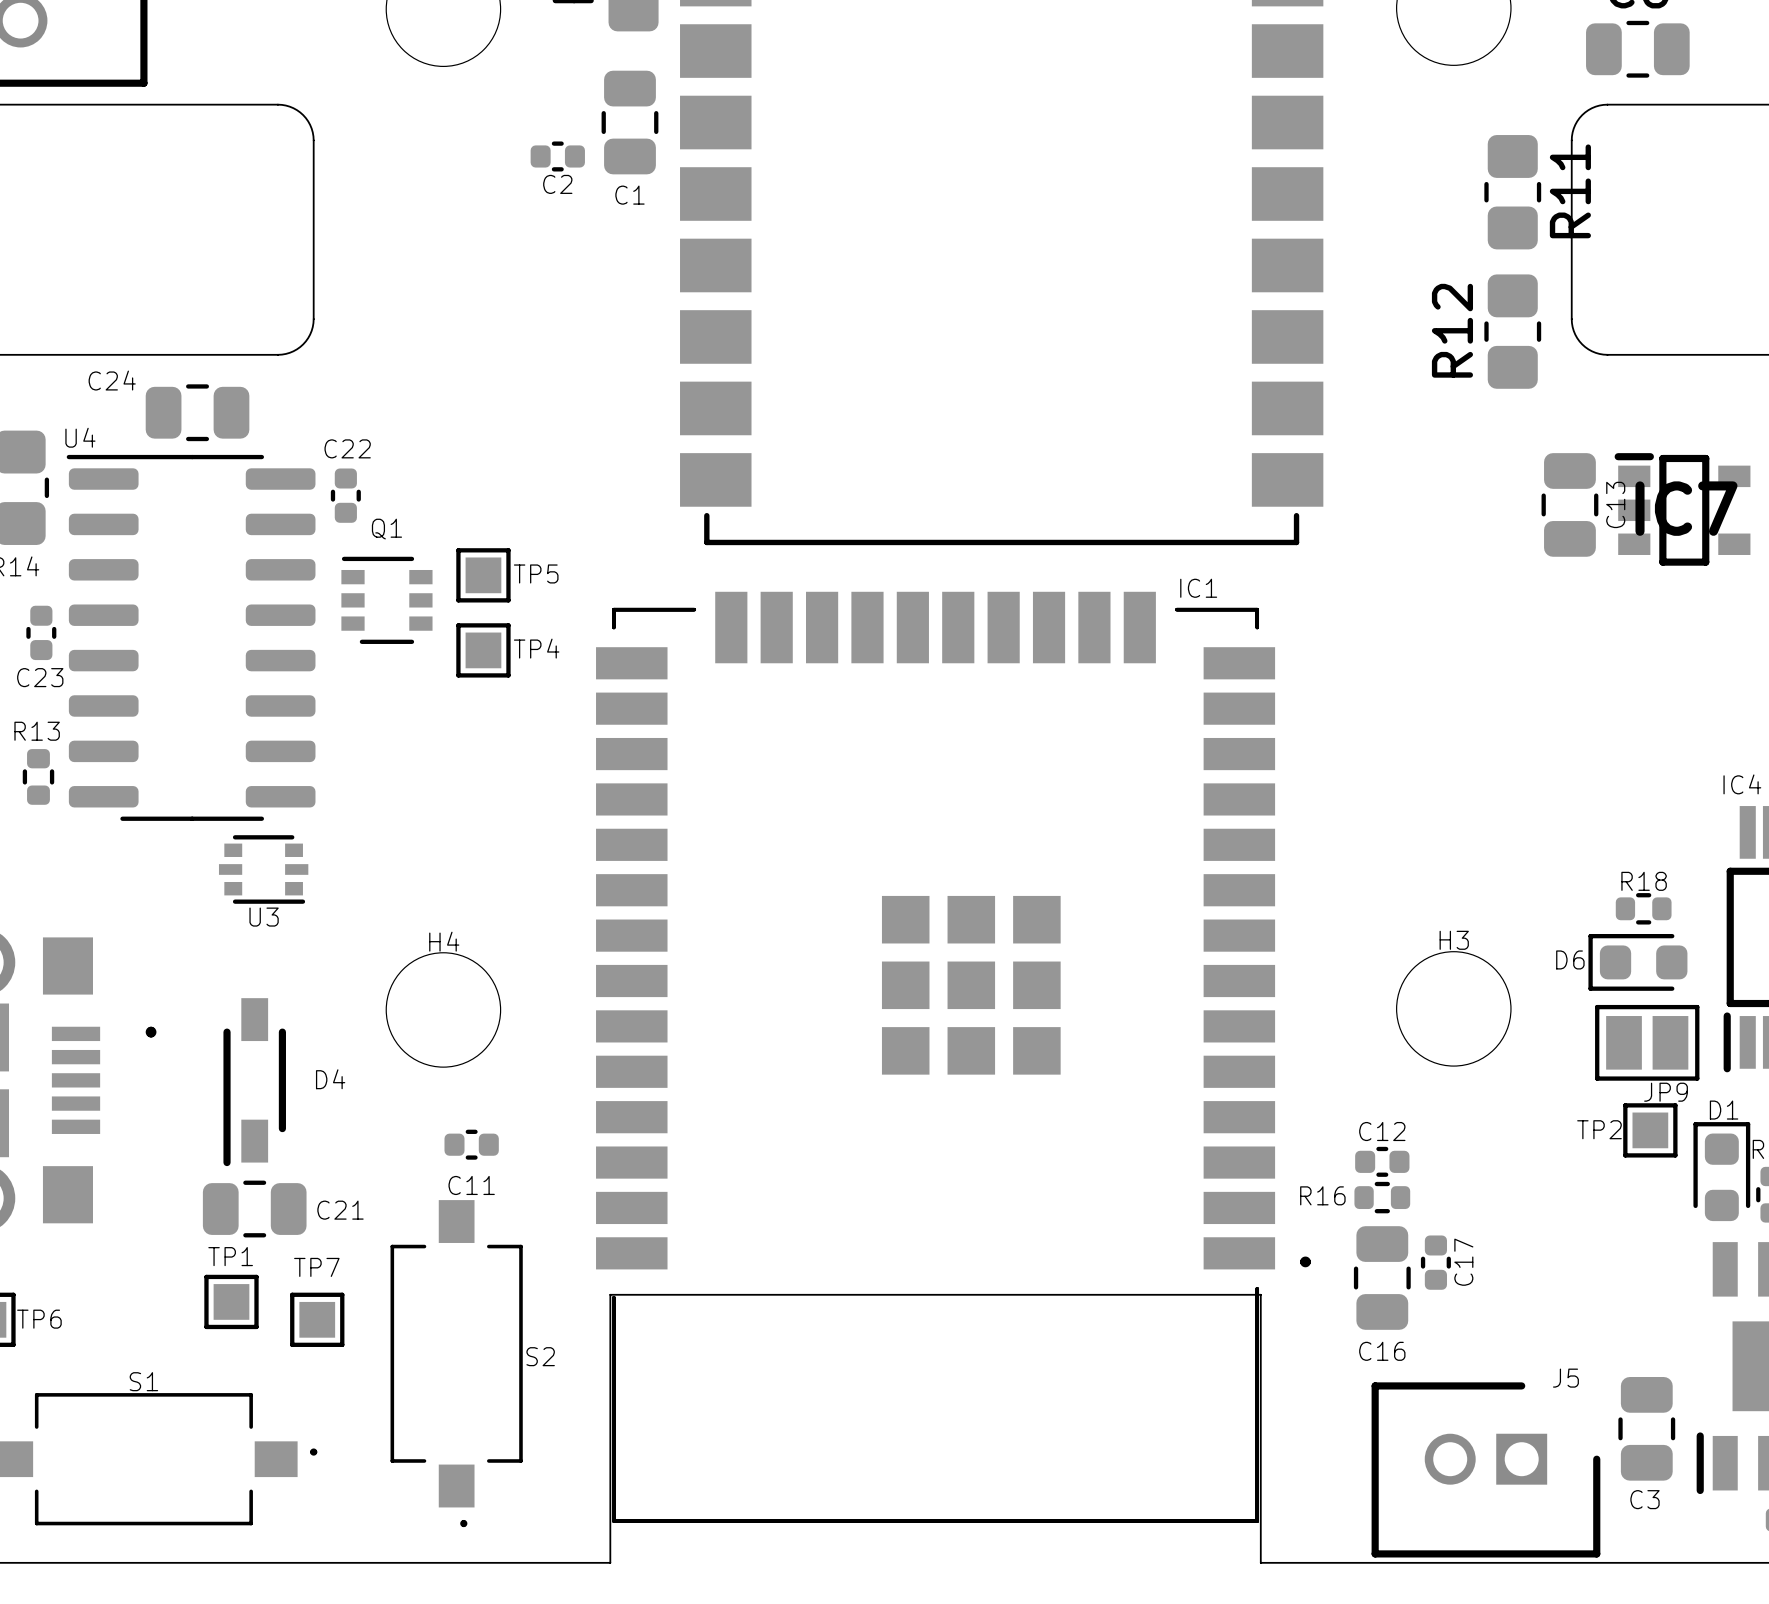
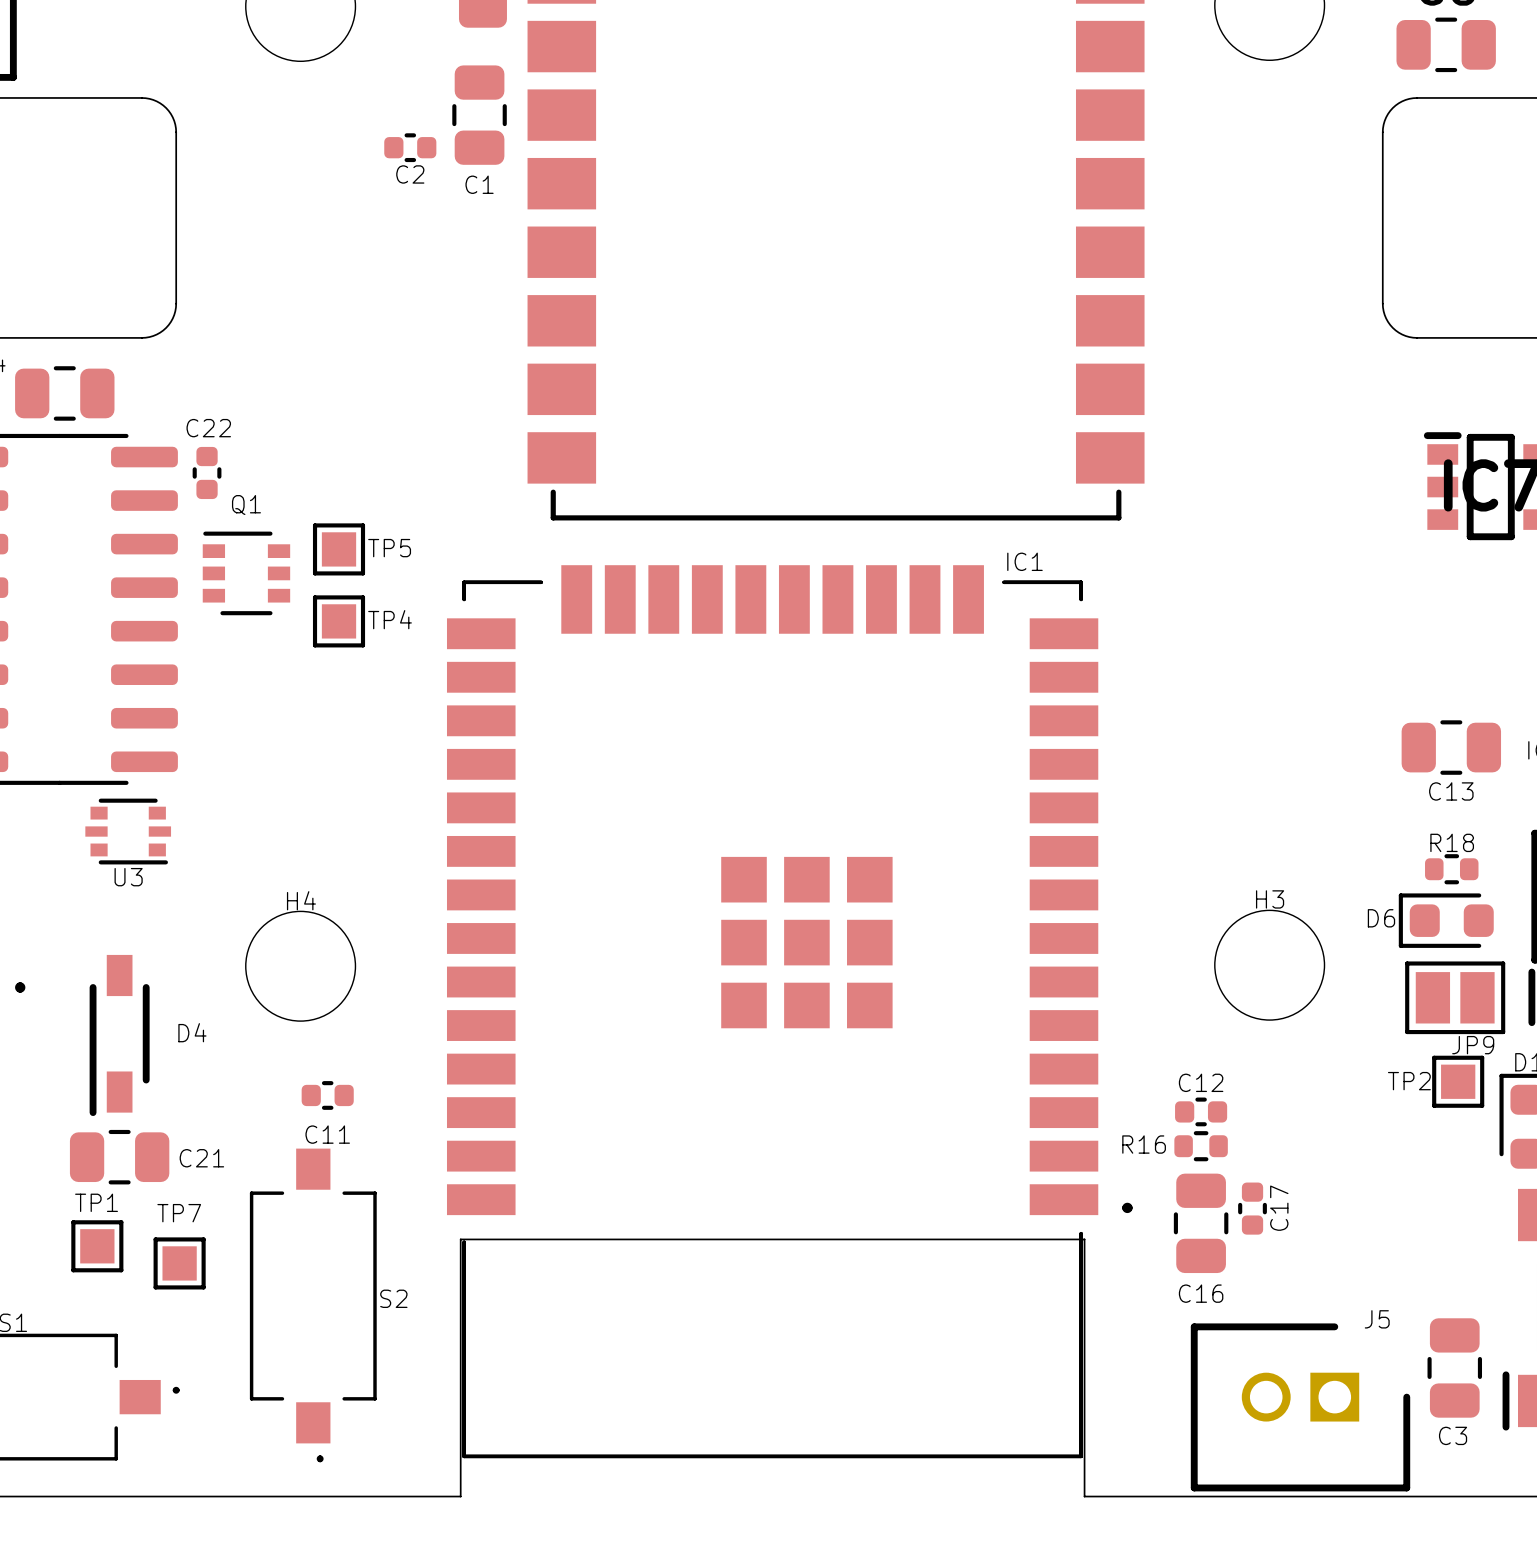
R11: (1512, 192) -> none
R12: (1512, 331) -> none
C13 rotation: 0° (1569, 504) -> 90° clockwise (1451, 747)
C13 position: (1569, 504) -> (1451, 747)

